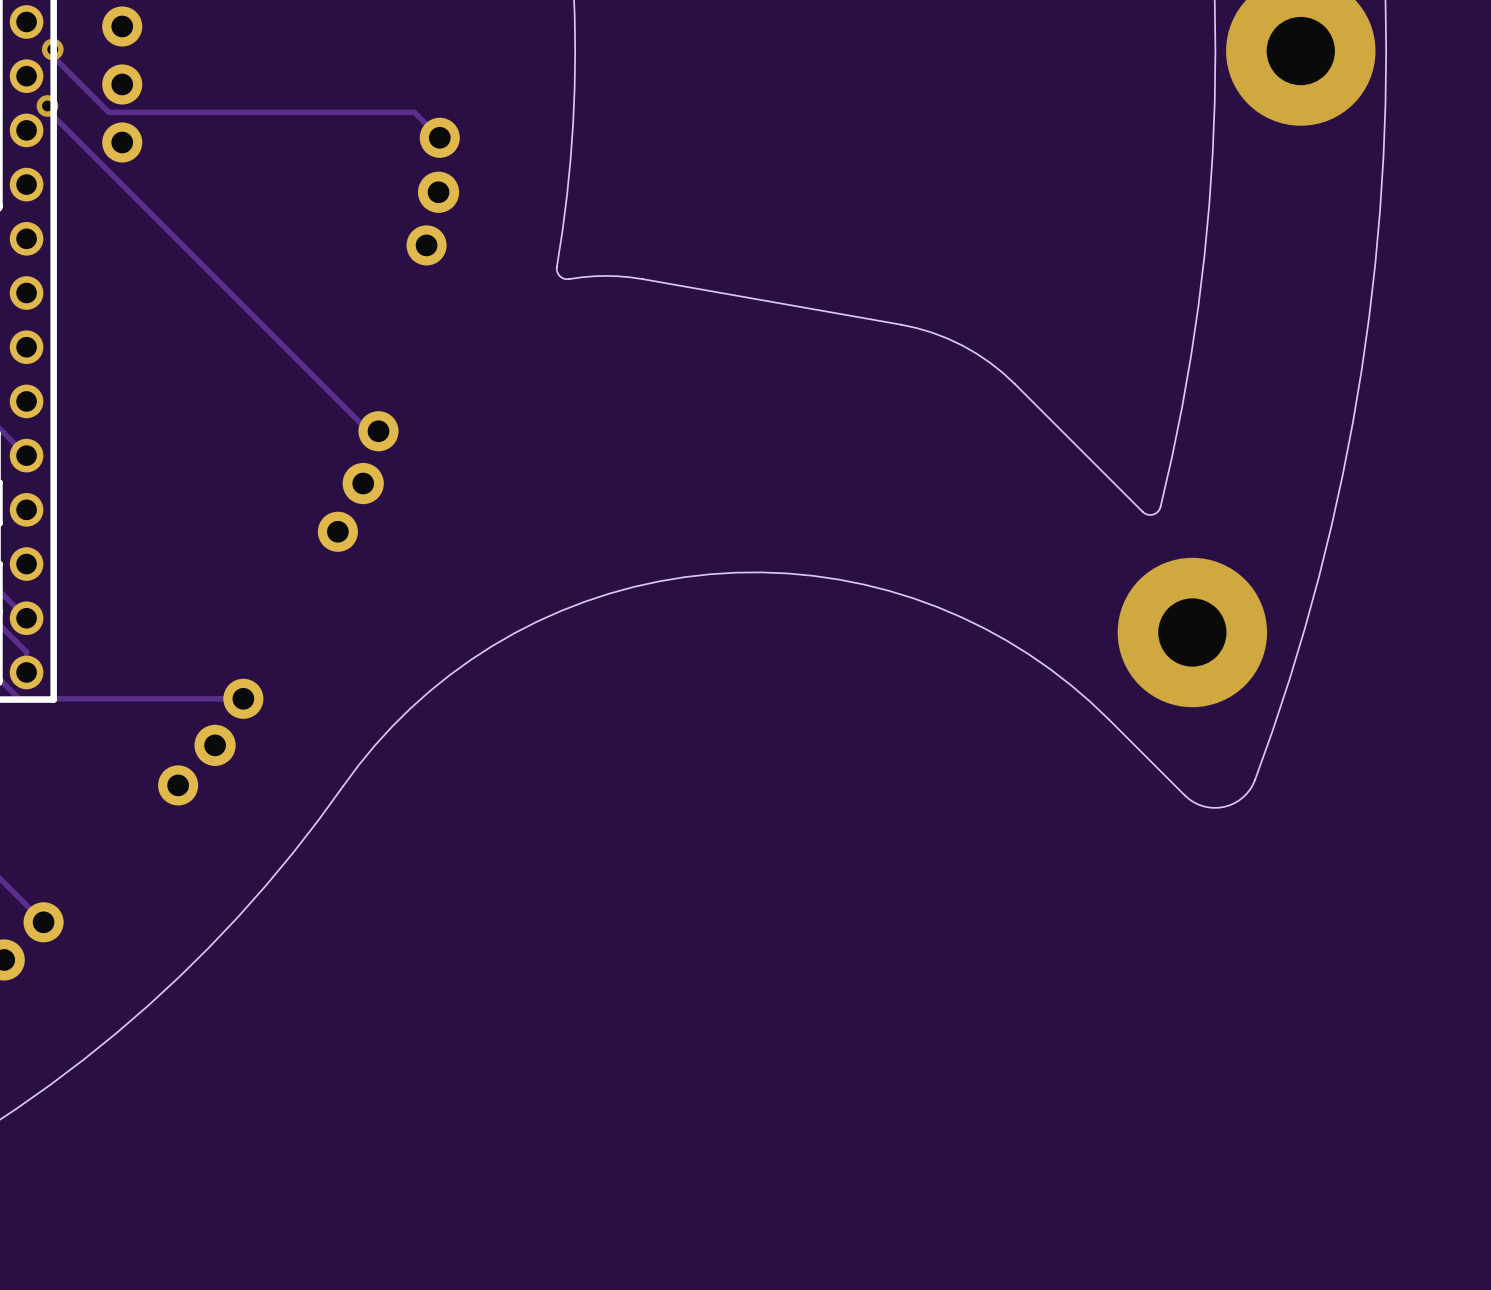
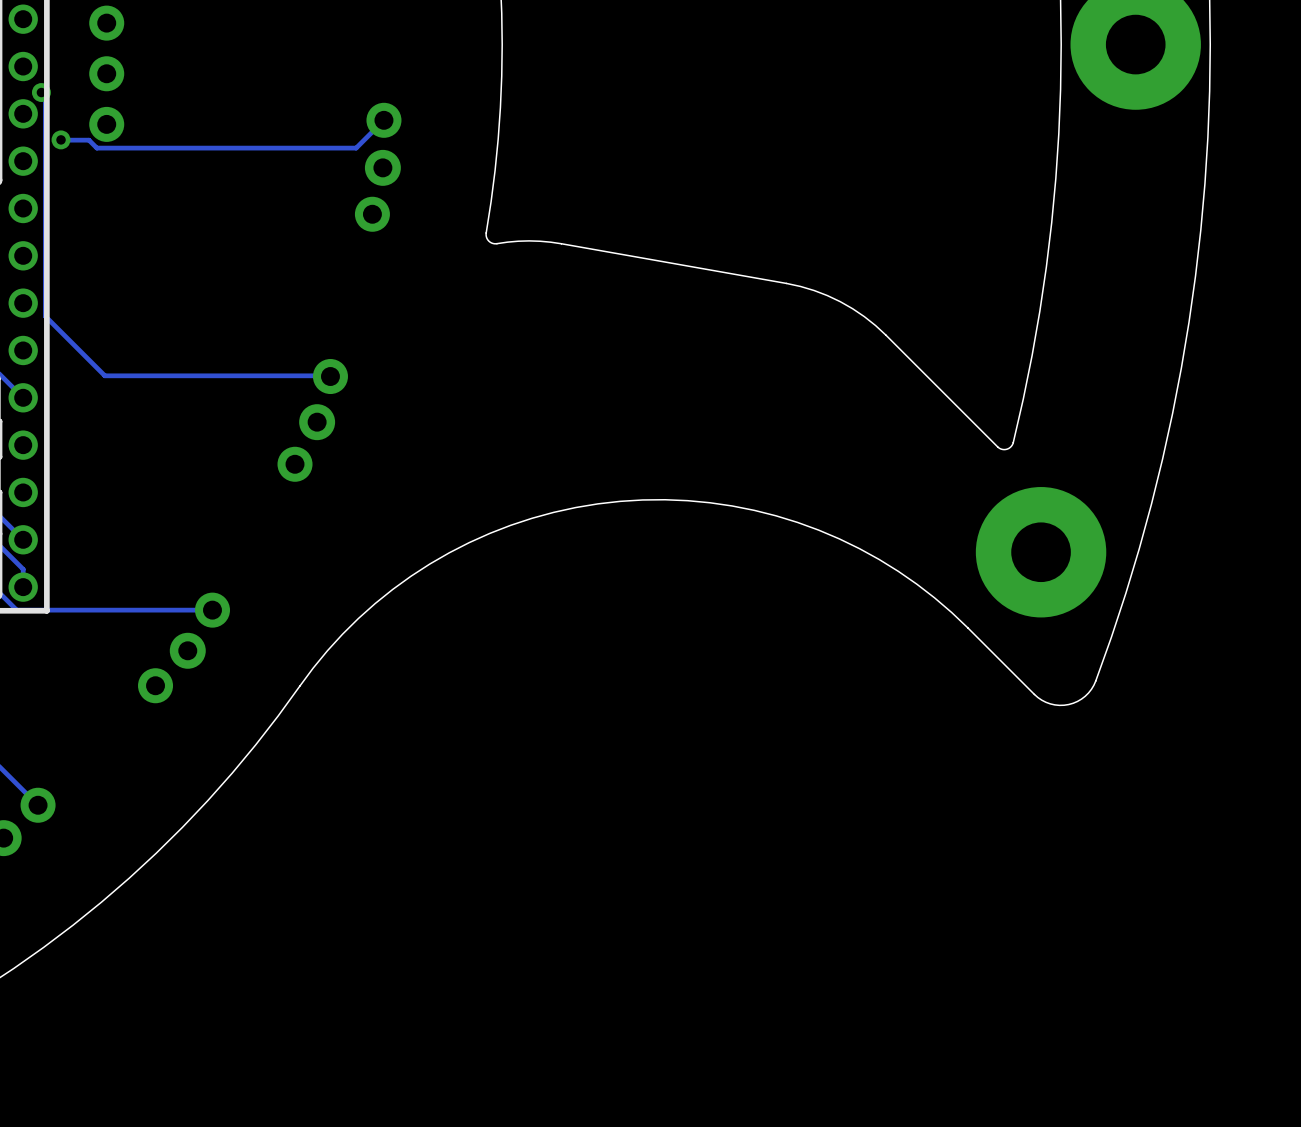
track: (52, 49) (52, 56) (108, 112) (414, 112) (439, 137) -> (61, 140) (88, 140) (96, 148) (356, 148) (383, 120)
via position: (52, 49) -> (61, 139)
track: (47, 105) (47, 110) (367, 430) -> (41, 92) (45, 96) (45, 316) (104, 375) (321, 375)

